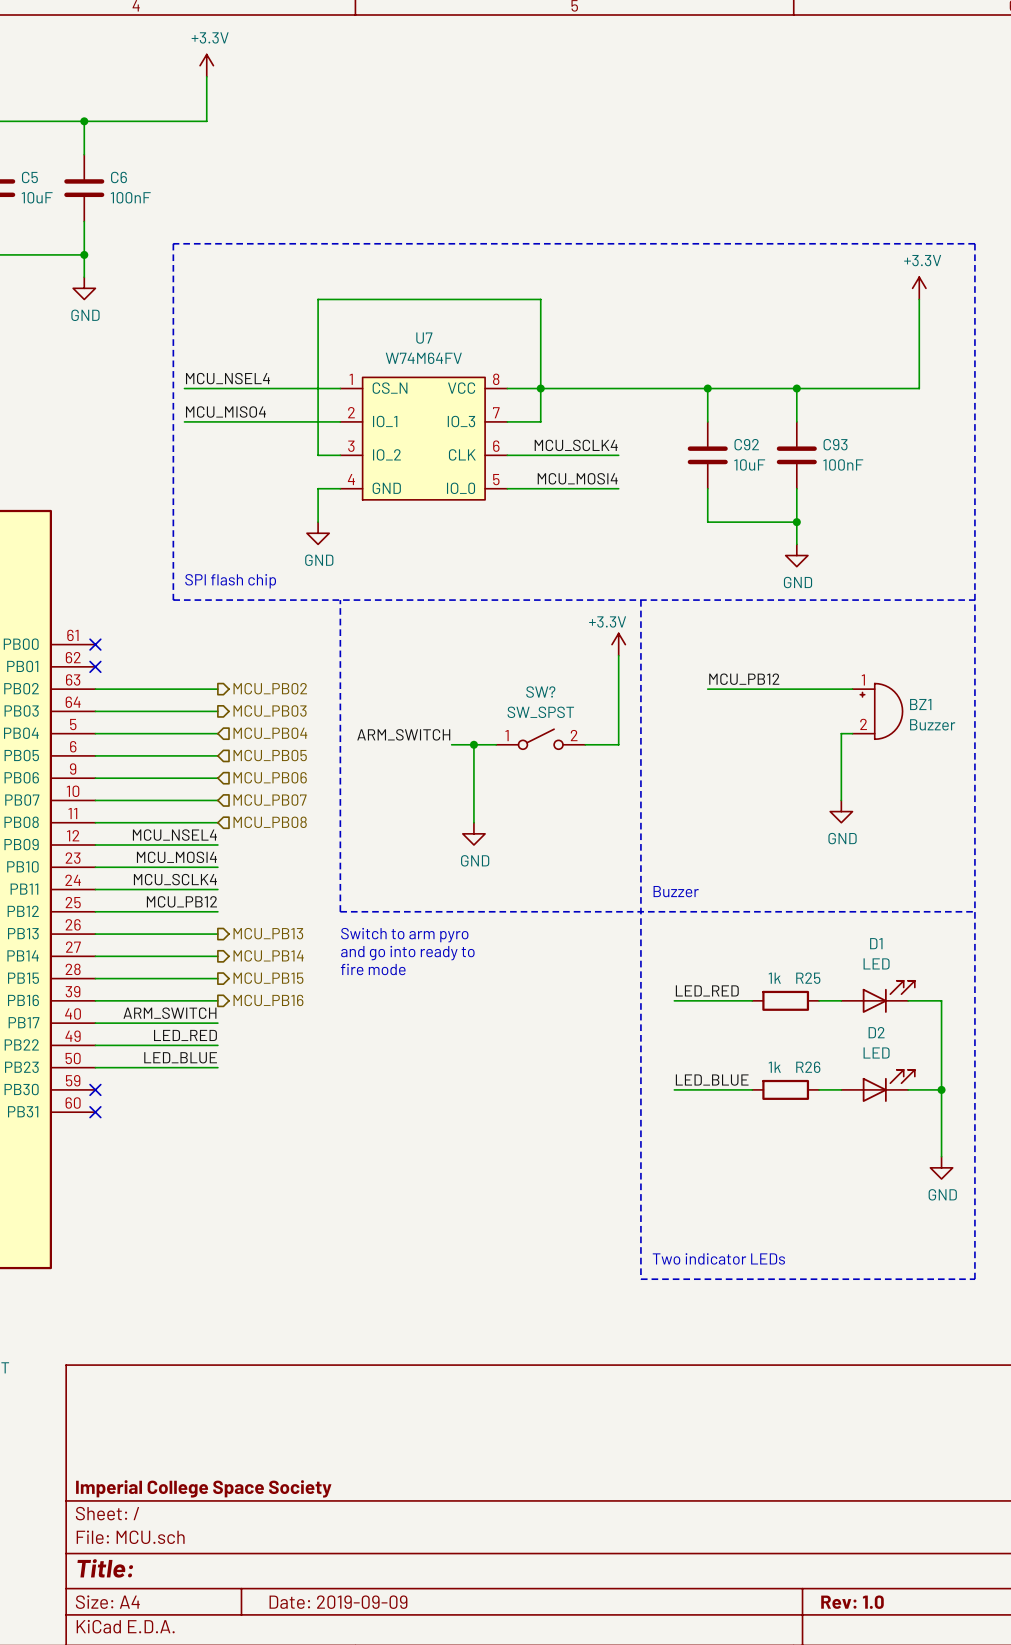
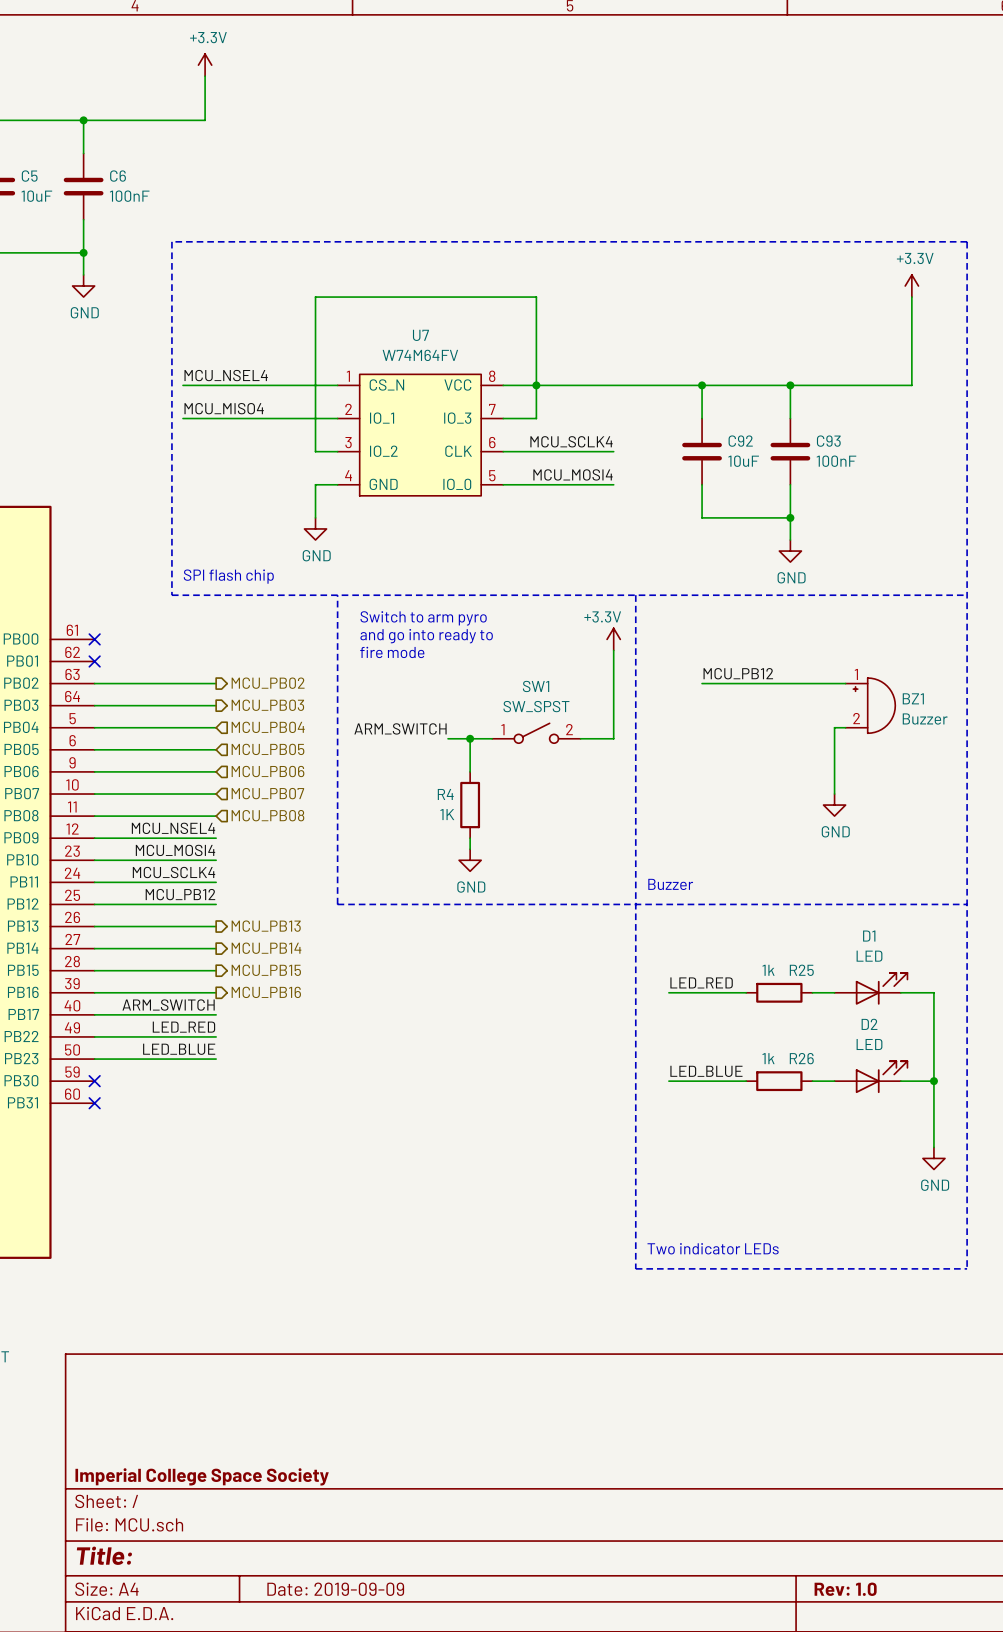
text: none -> Switch to arm pyro (423, 618)
text: none -> and go into ready to (426, 636)
text: none -> fire mode (392, 652)
SW? name: SW? (540, 692) -> SW1 (536, 686)
wire: (473, 778) (473, 822) -> none
R4: none -> 1K (470, 805)
power symbol position: GND (473, 833) -> GND (470, 860)
wire: none -> (470, 838) (470, 849)
text: Switch to arm pyro (404, 935) -> none
text: and go into ready to (407, 953) -> none
text: fire mode (373, 969) -> none

